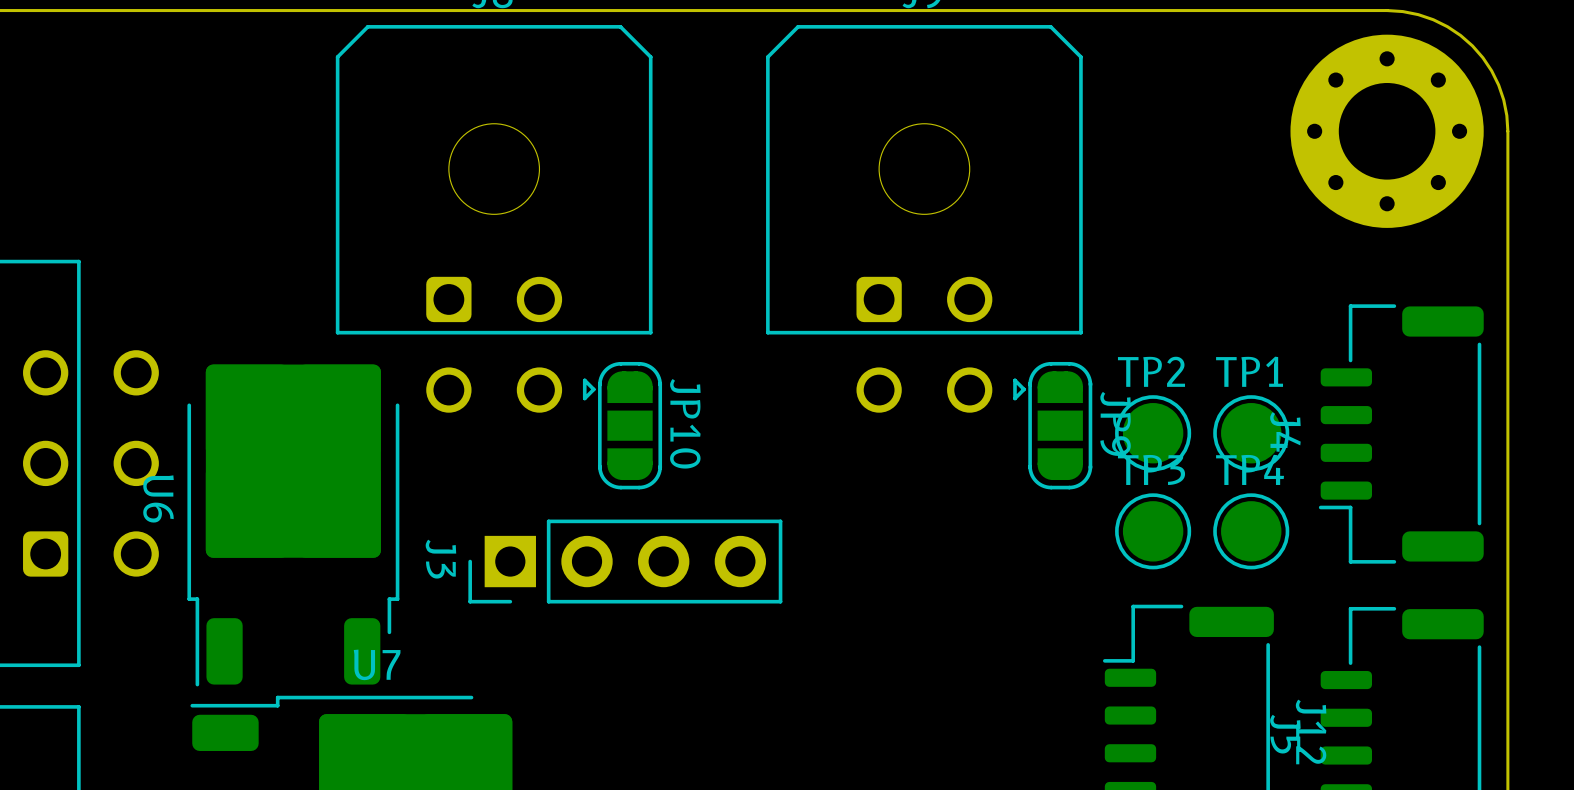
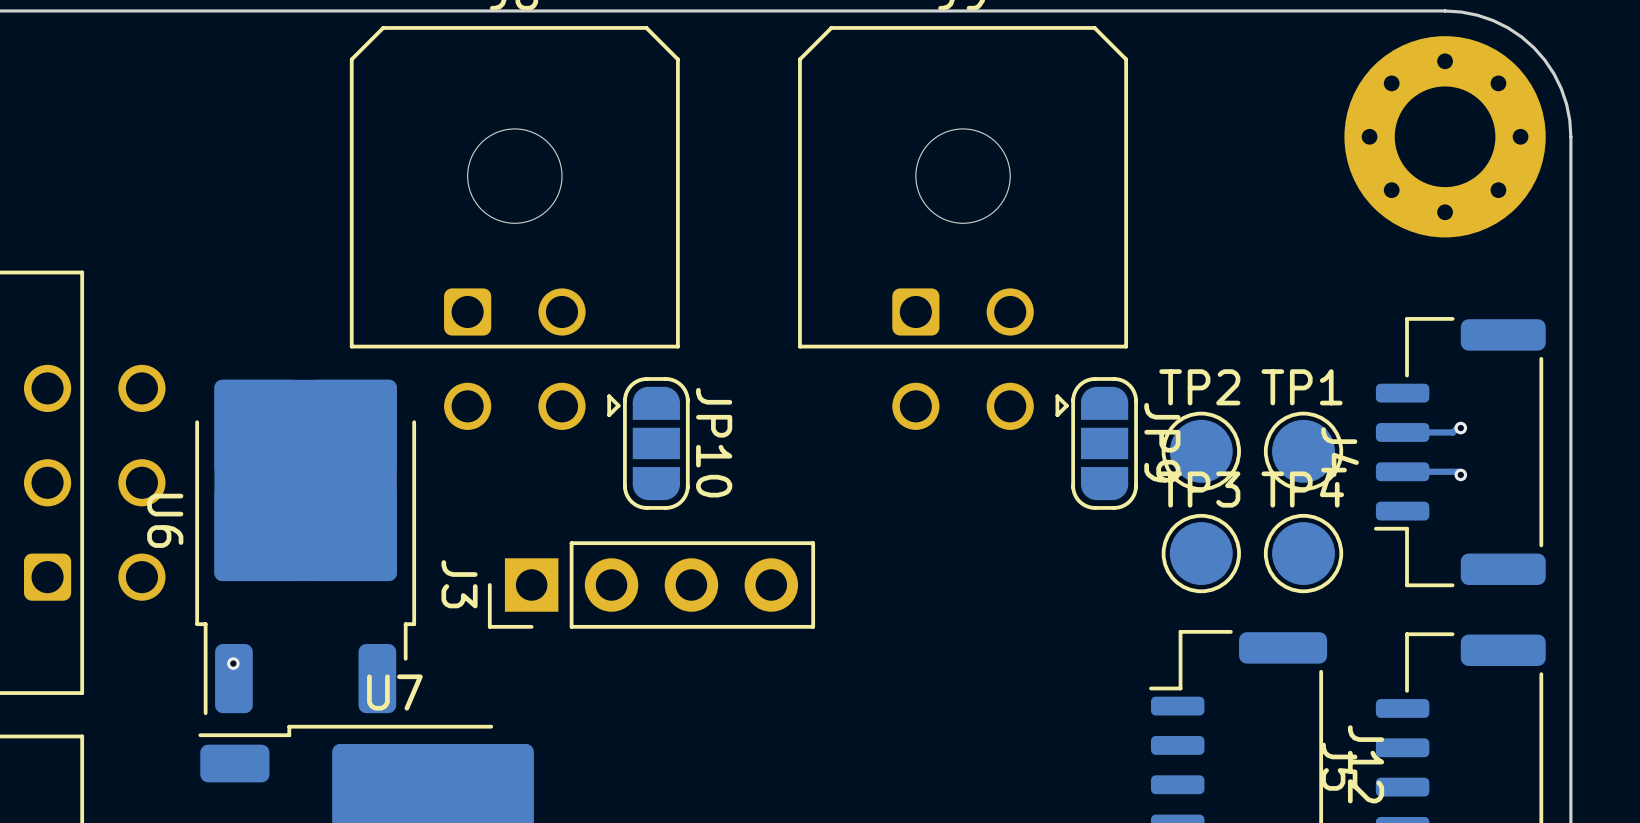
track: none -> (1460, 428) (1457, 428) (1453, 432) (1402, 432)
via: none -> (1460, 428)
track: none -> (1402, 471) (1457, 471) (1460, 474)
via: none -> (1460, 474)
via: none -> (233, 663)

